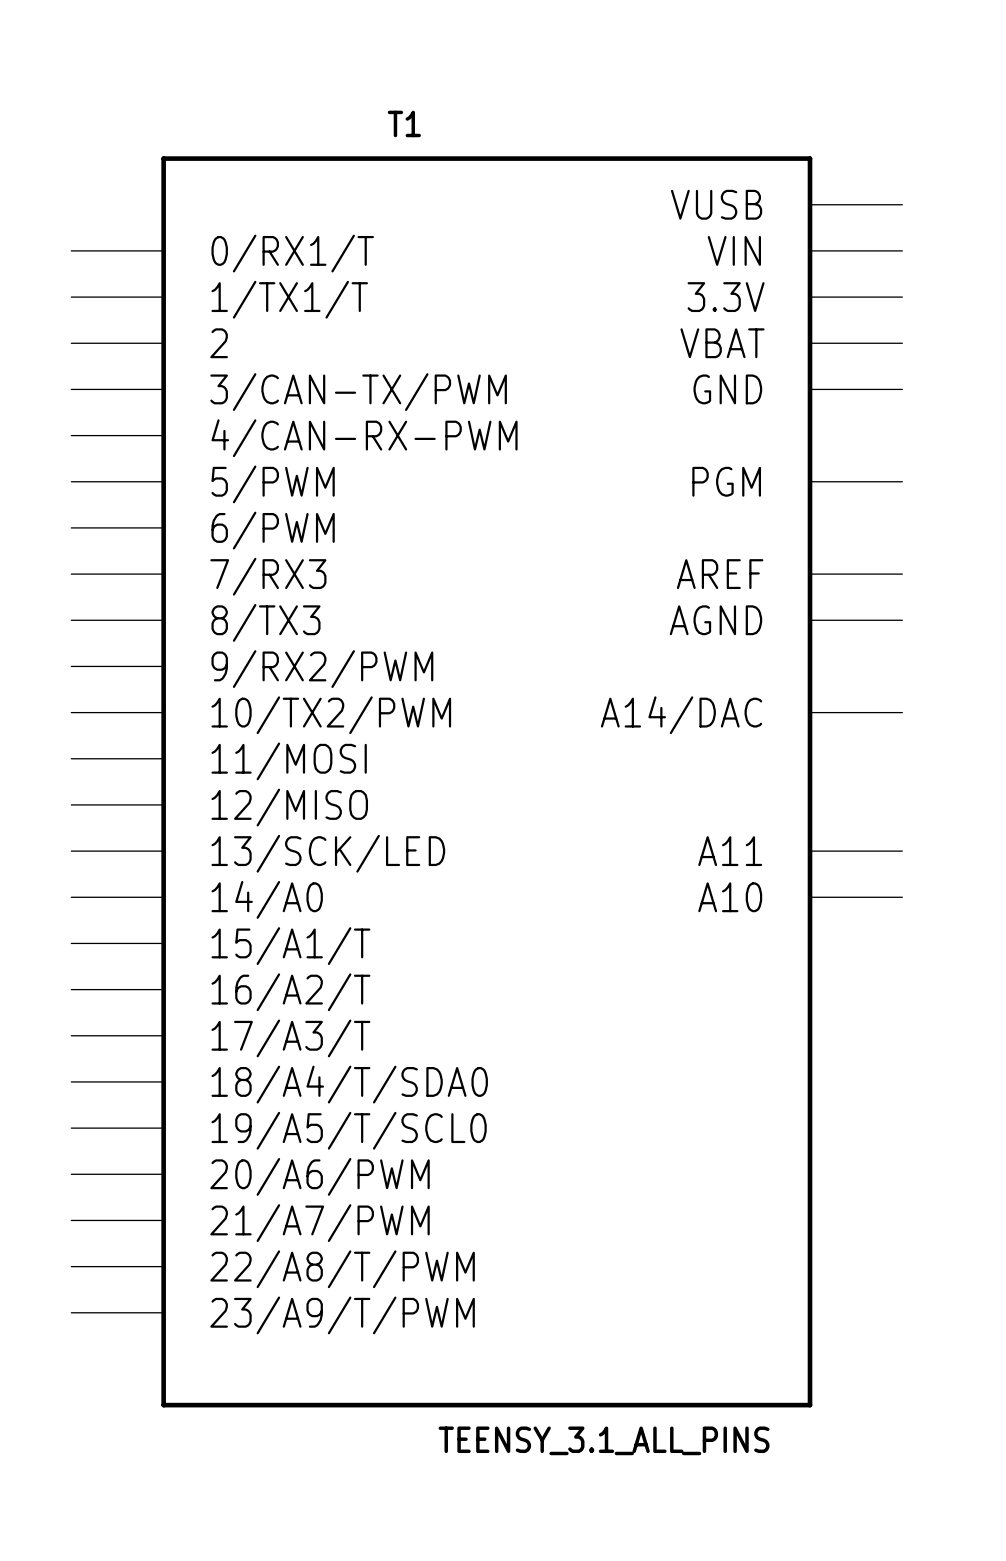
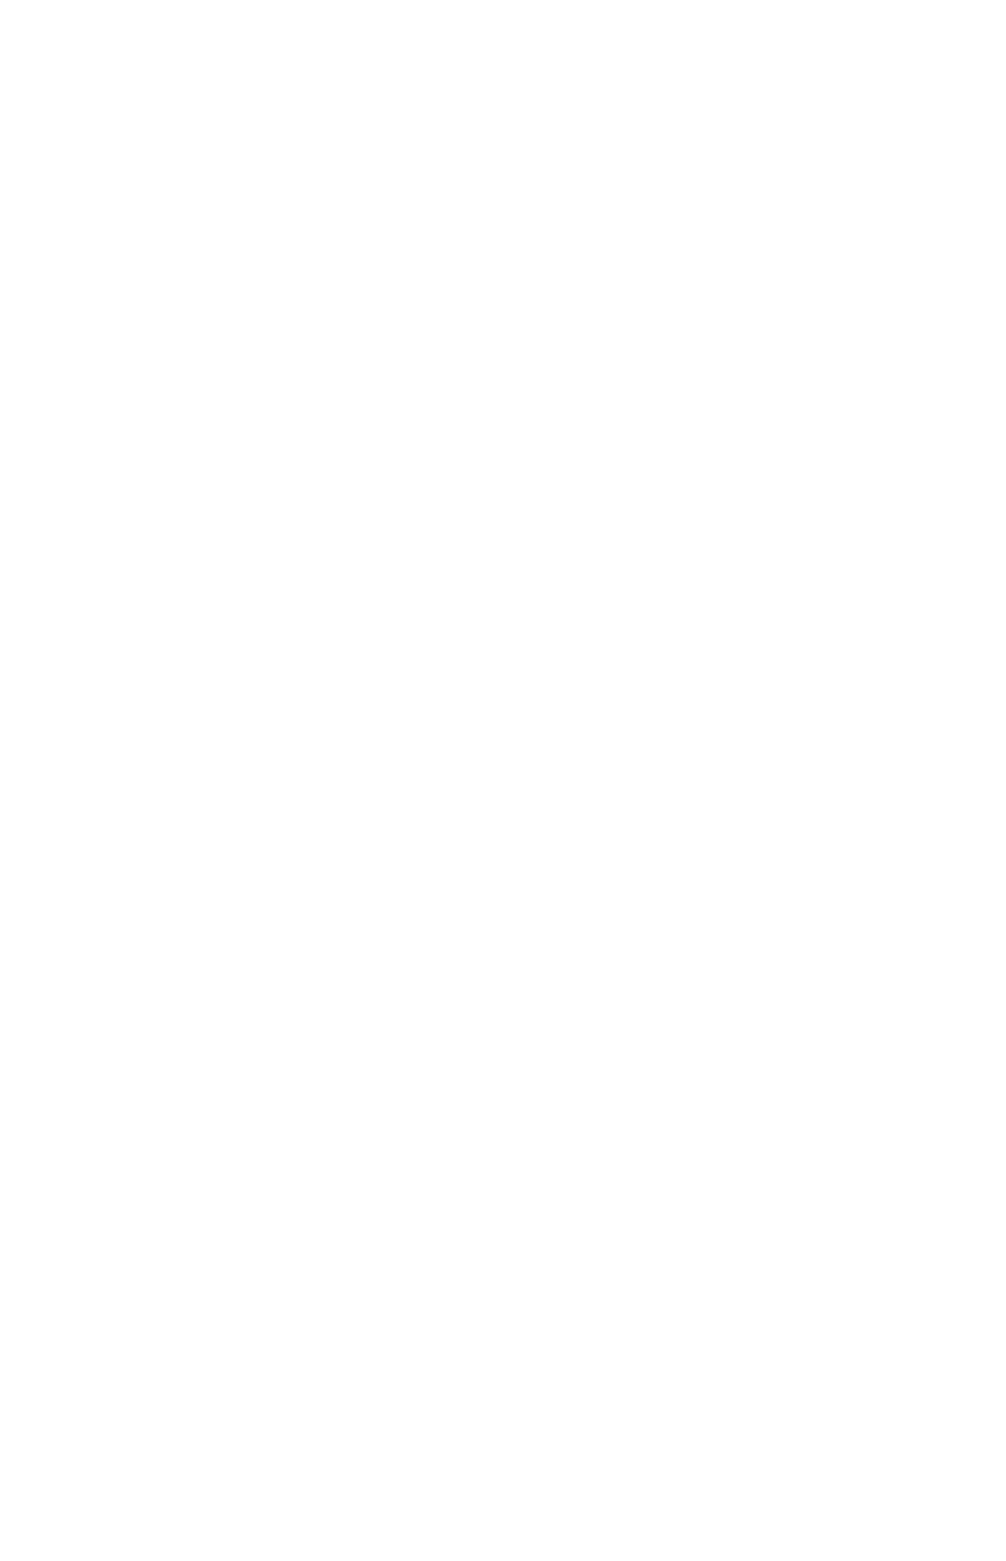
T1: TEENSY_3.1_ALL_PINS (486, 781) -> none

